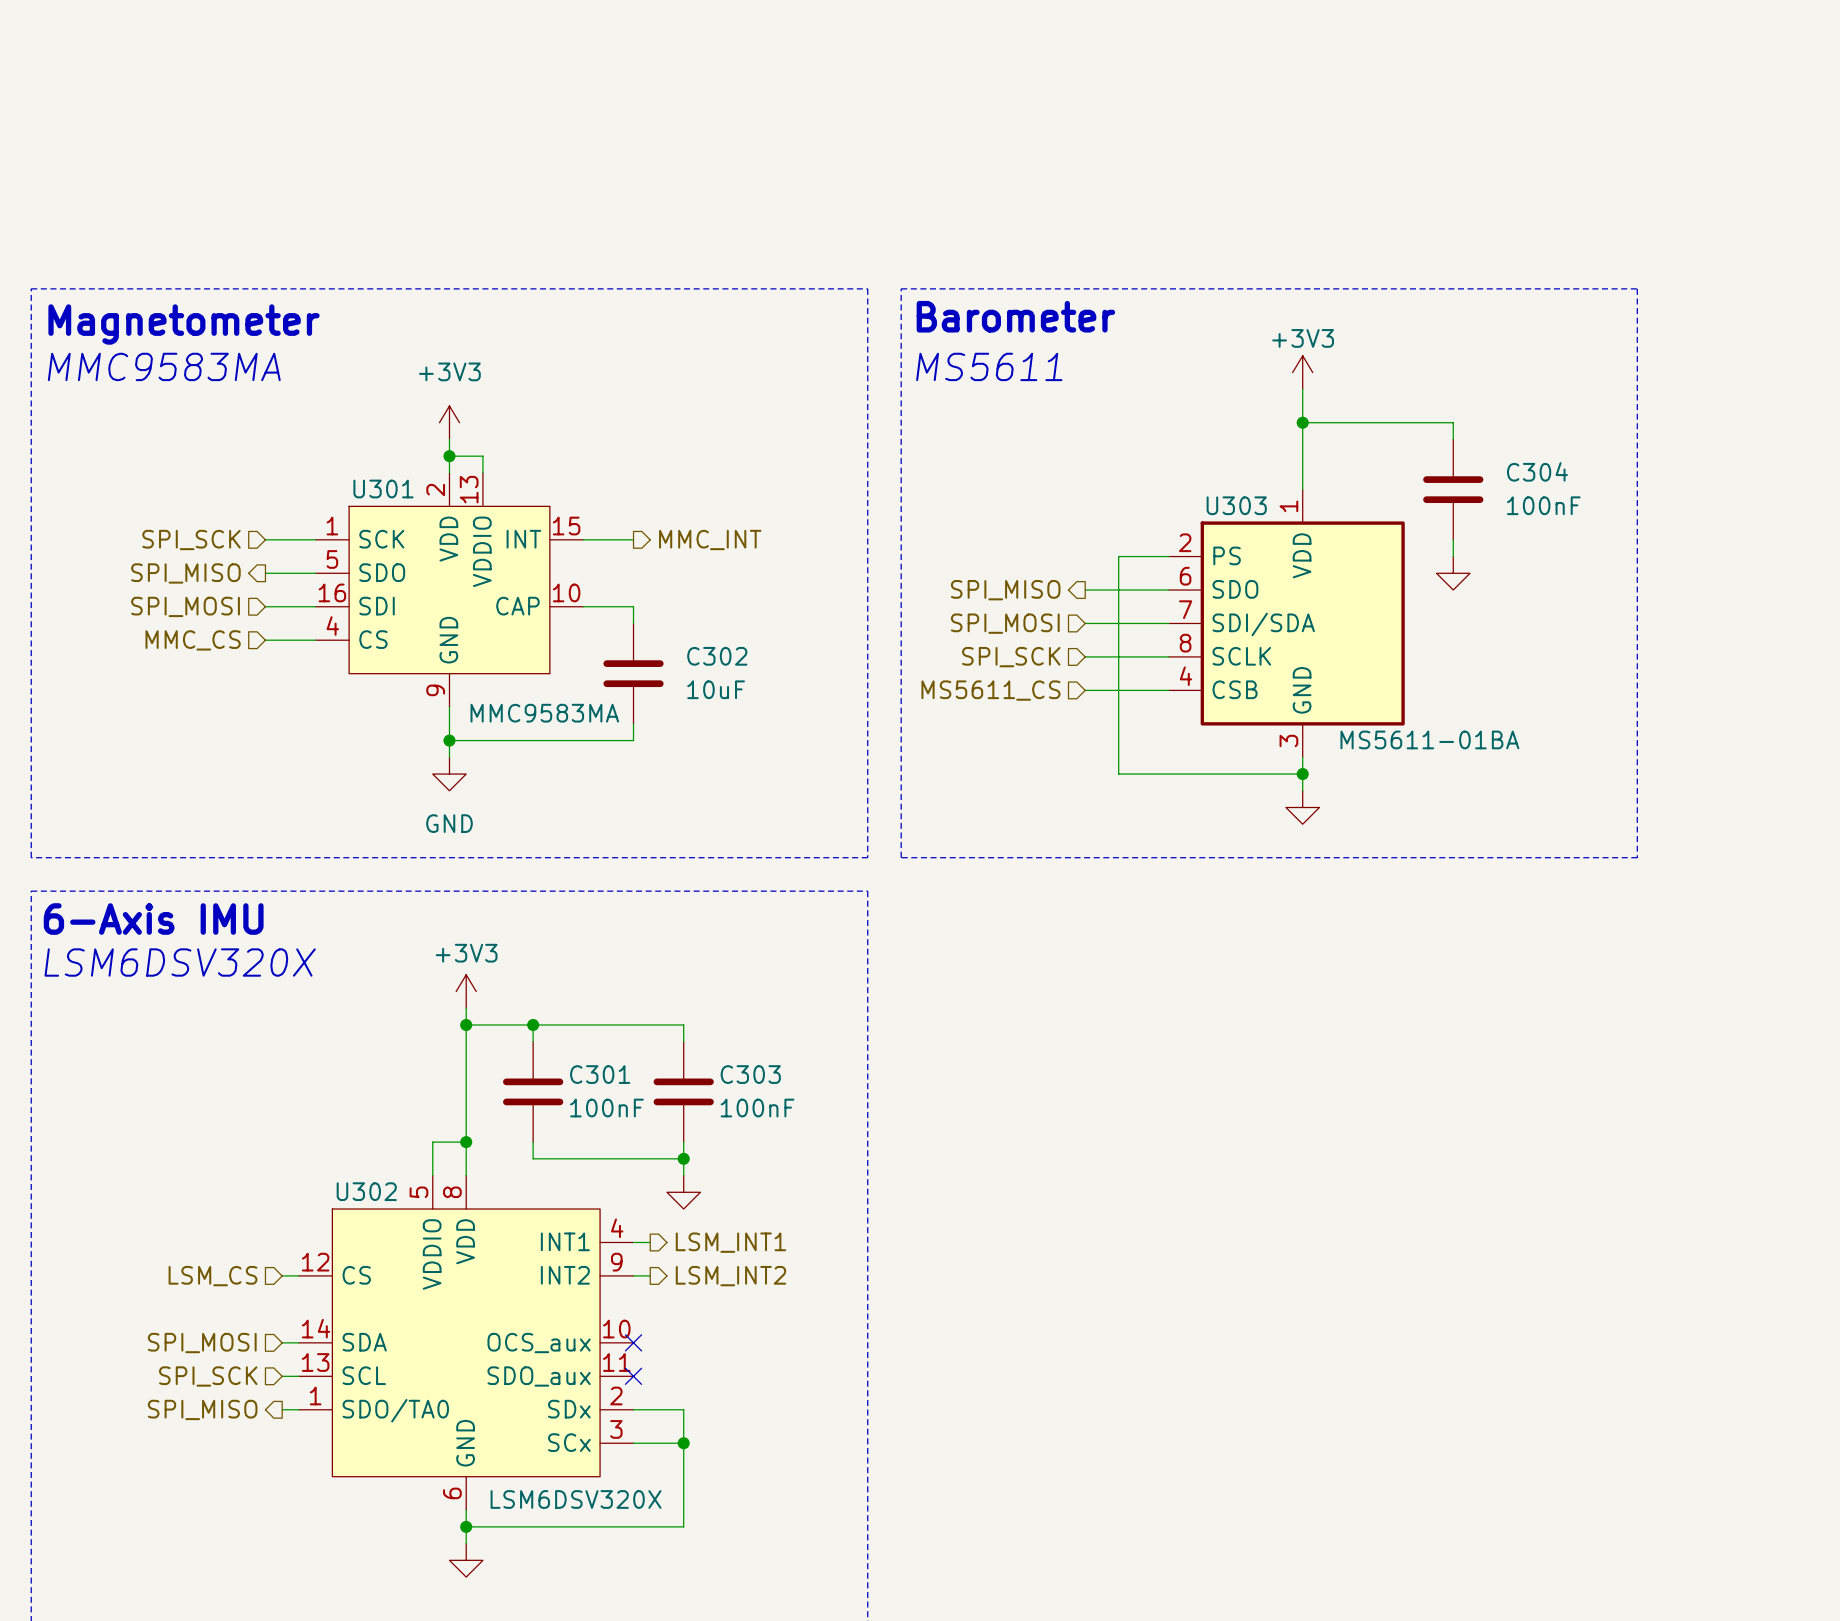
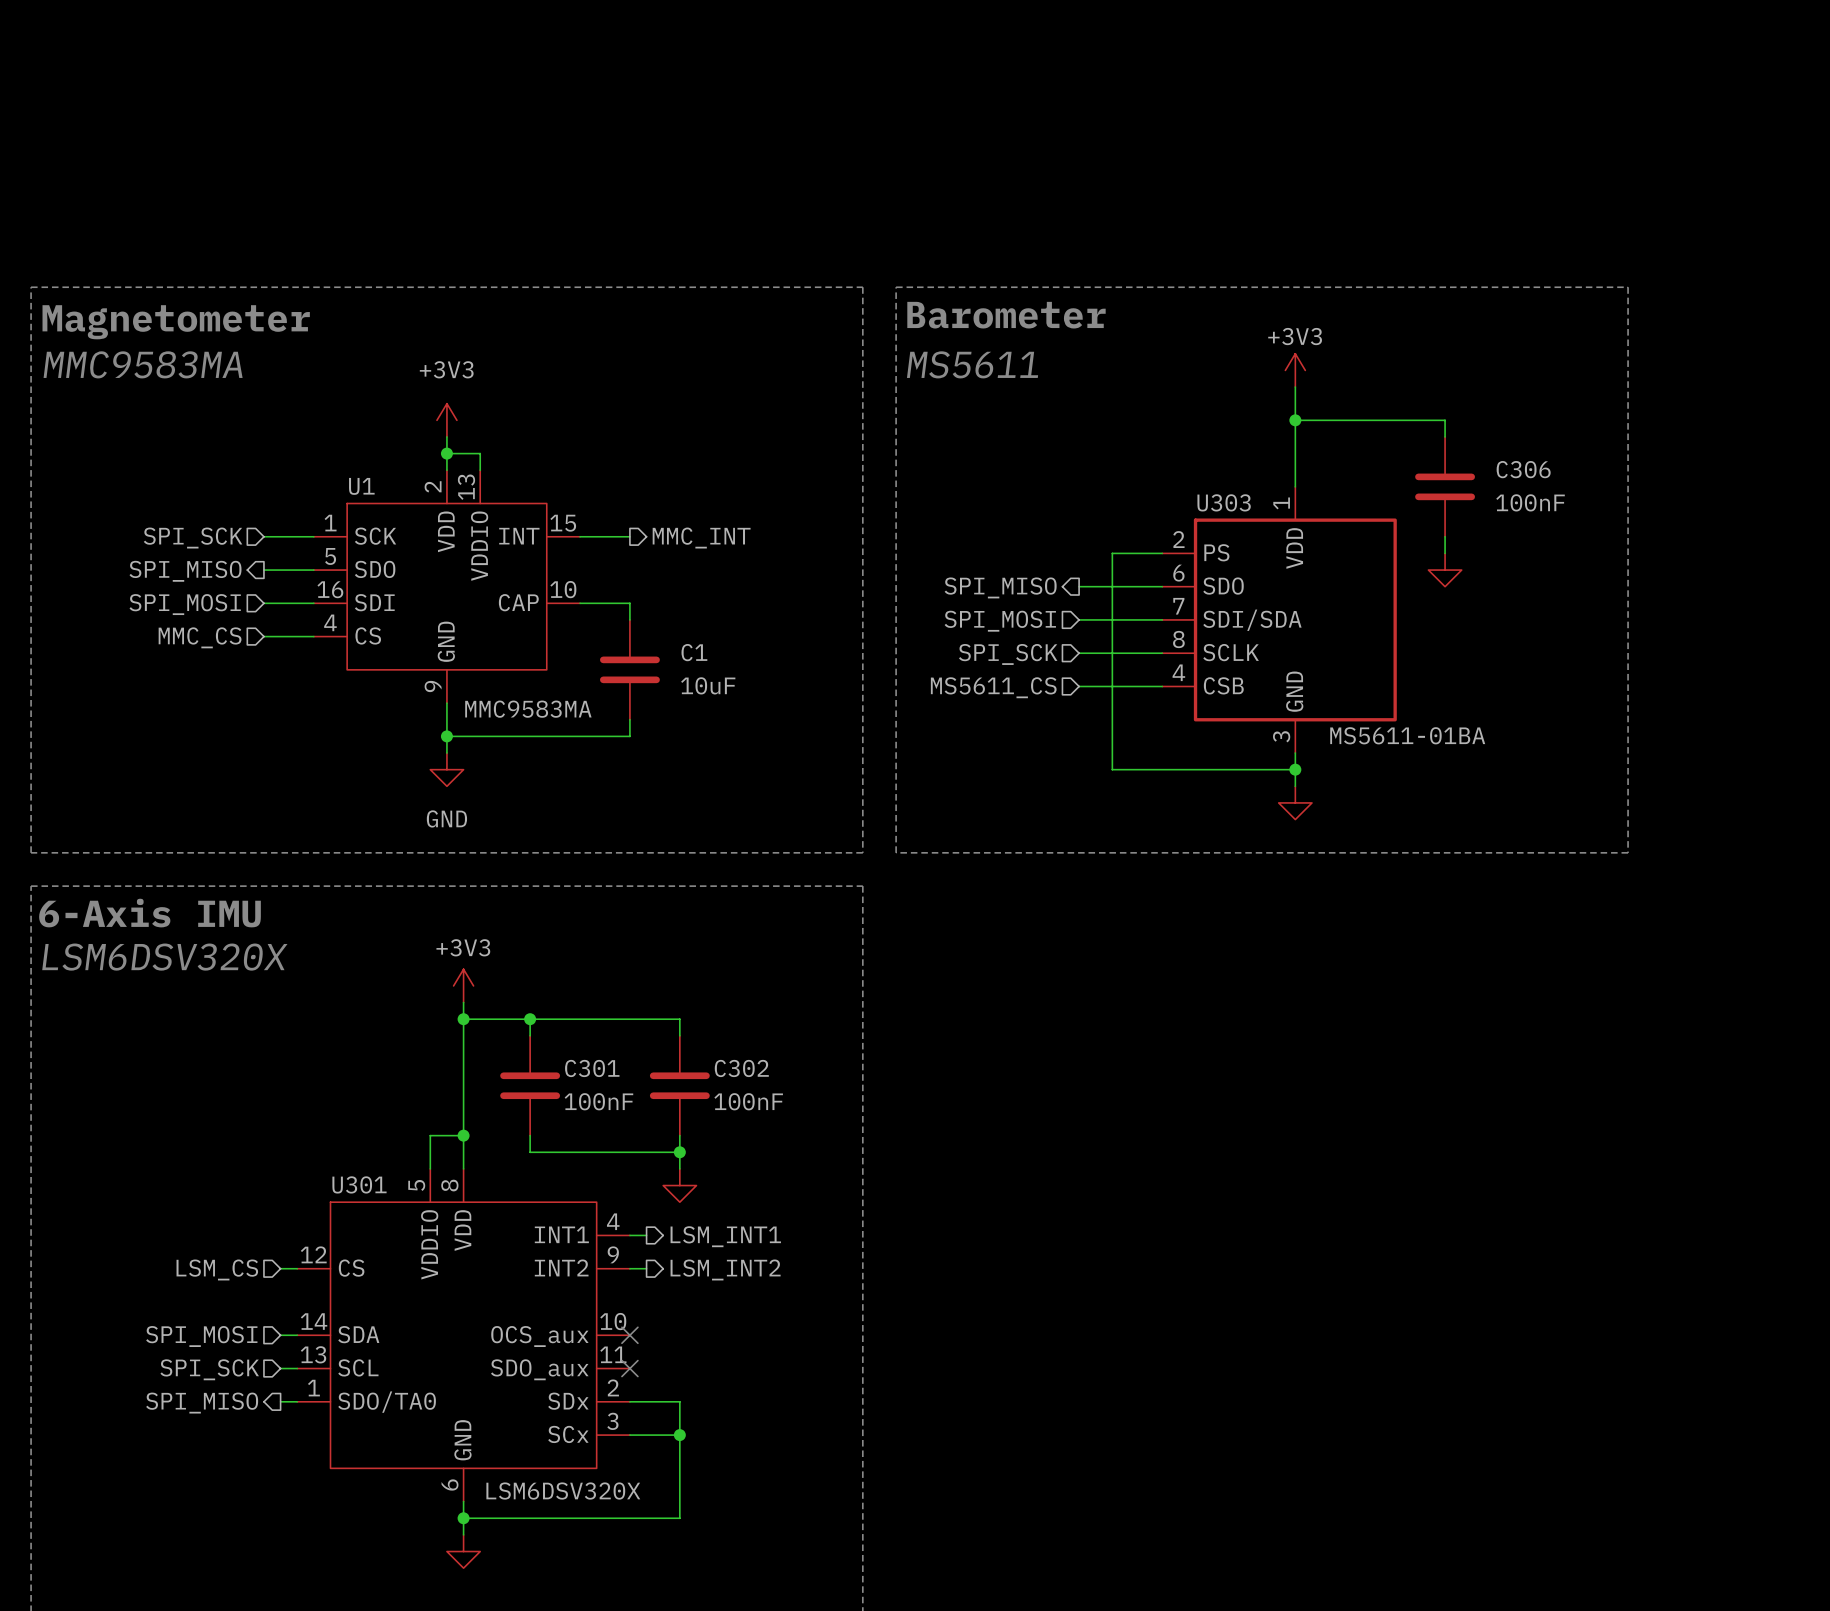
C304 name: C304 (1537, 471) -> C306 (1523, 469)
U301 name: U301 (383, 489) -> U1 (361, 486)
C302 name: C302 (717, 656) -> C1 (694, 652)
C303 name: C303 (750, 1074) -> C302 (741, 1068)
U302 name: U302 (366, 1191) -> U301 (359, 1184)

